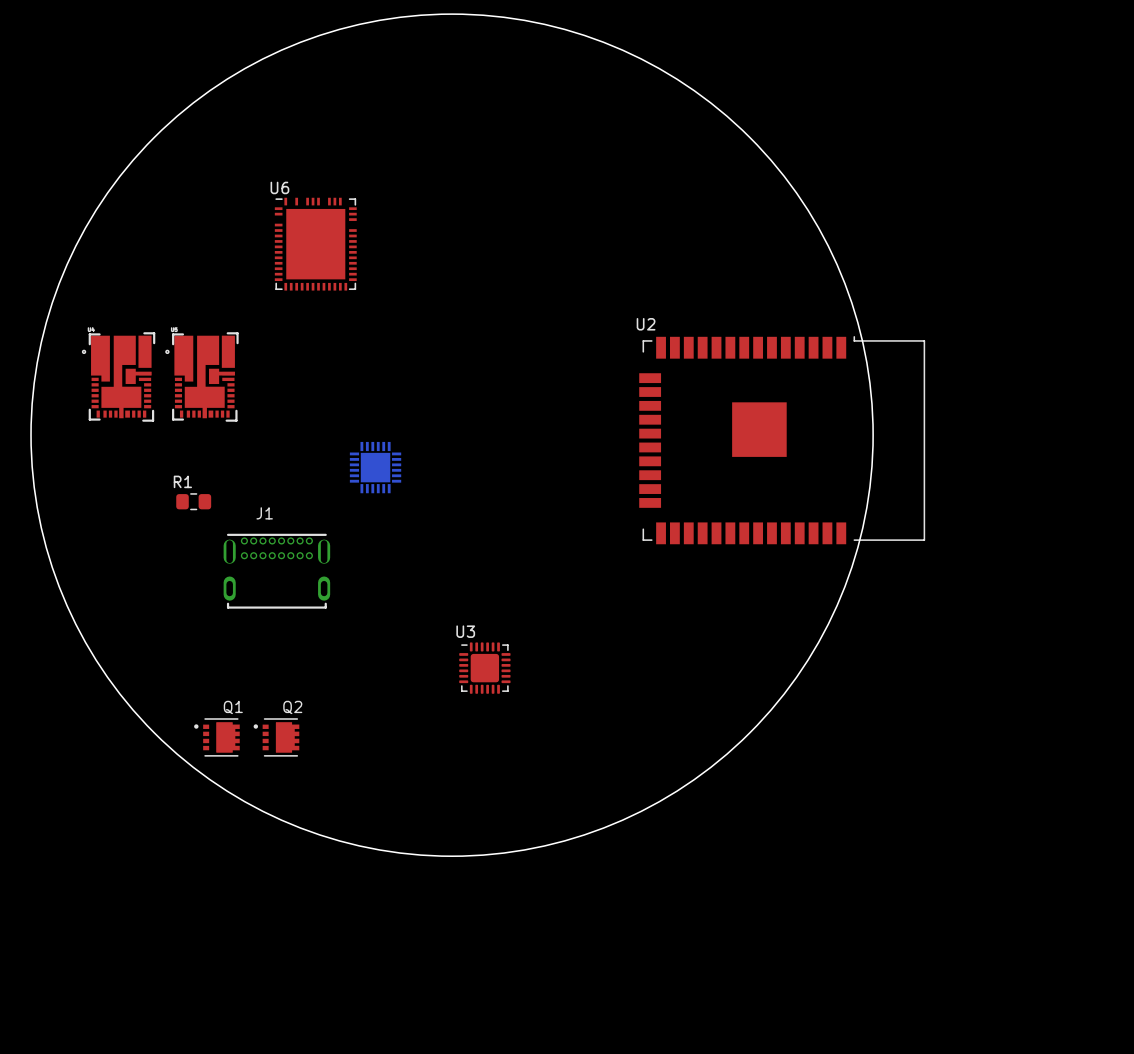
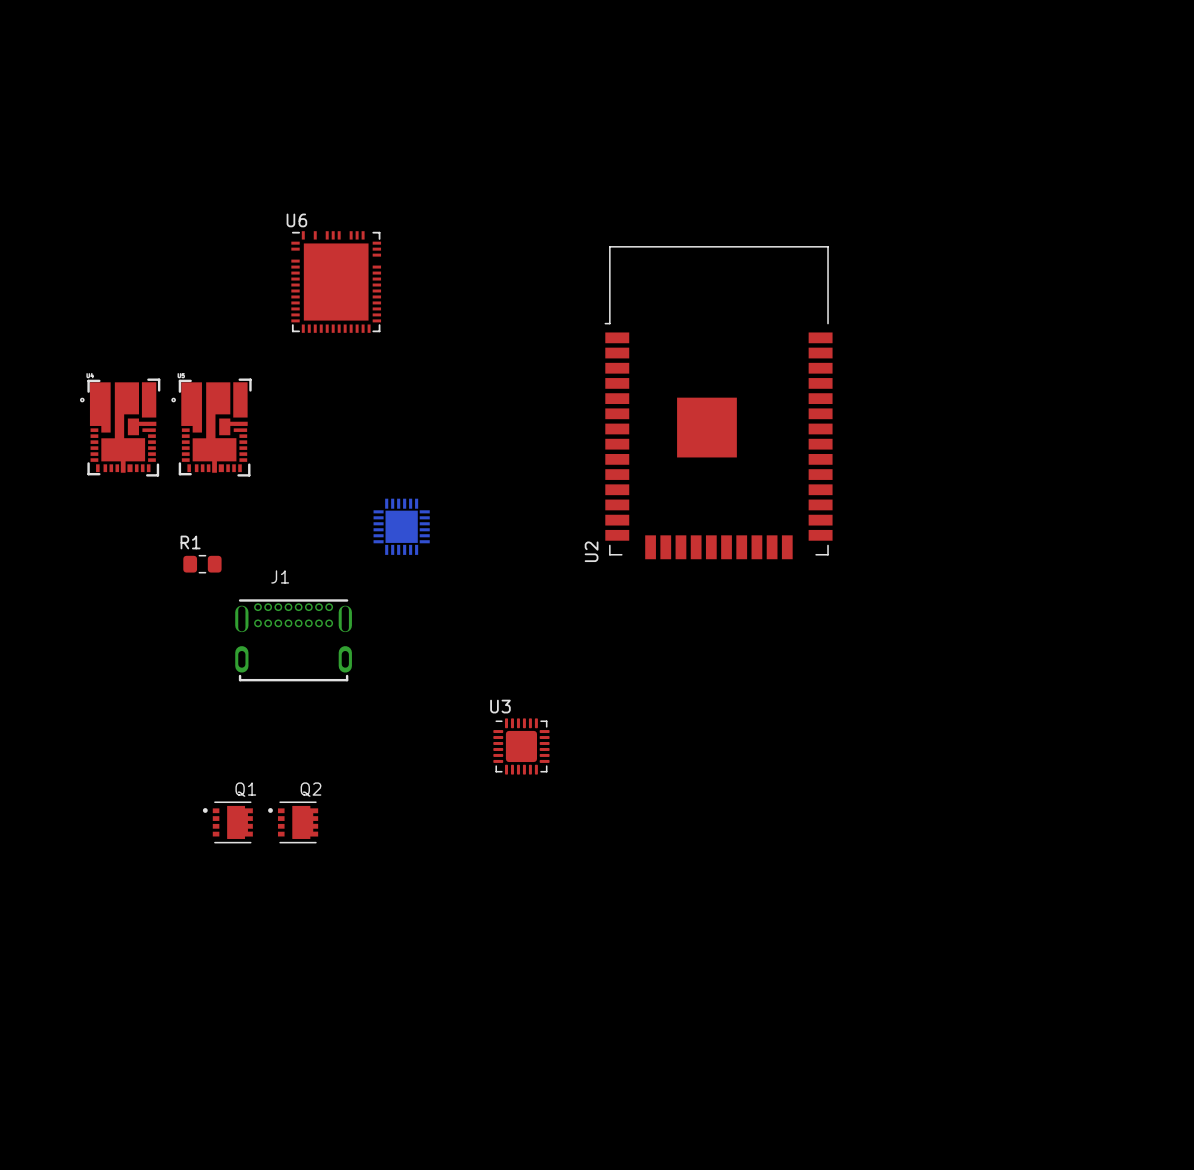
round board edge: [30, 13, 874, 857] -> none
U2 rotation: 0° (782, 440) -> 90° counterclockwise (718, 402)

